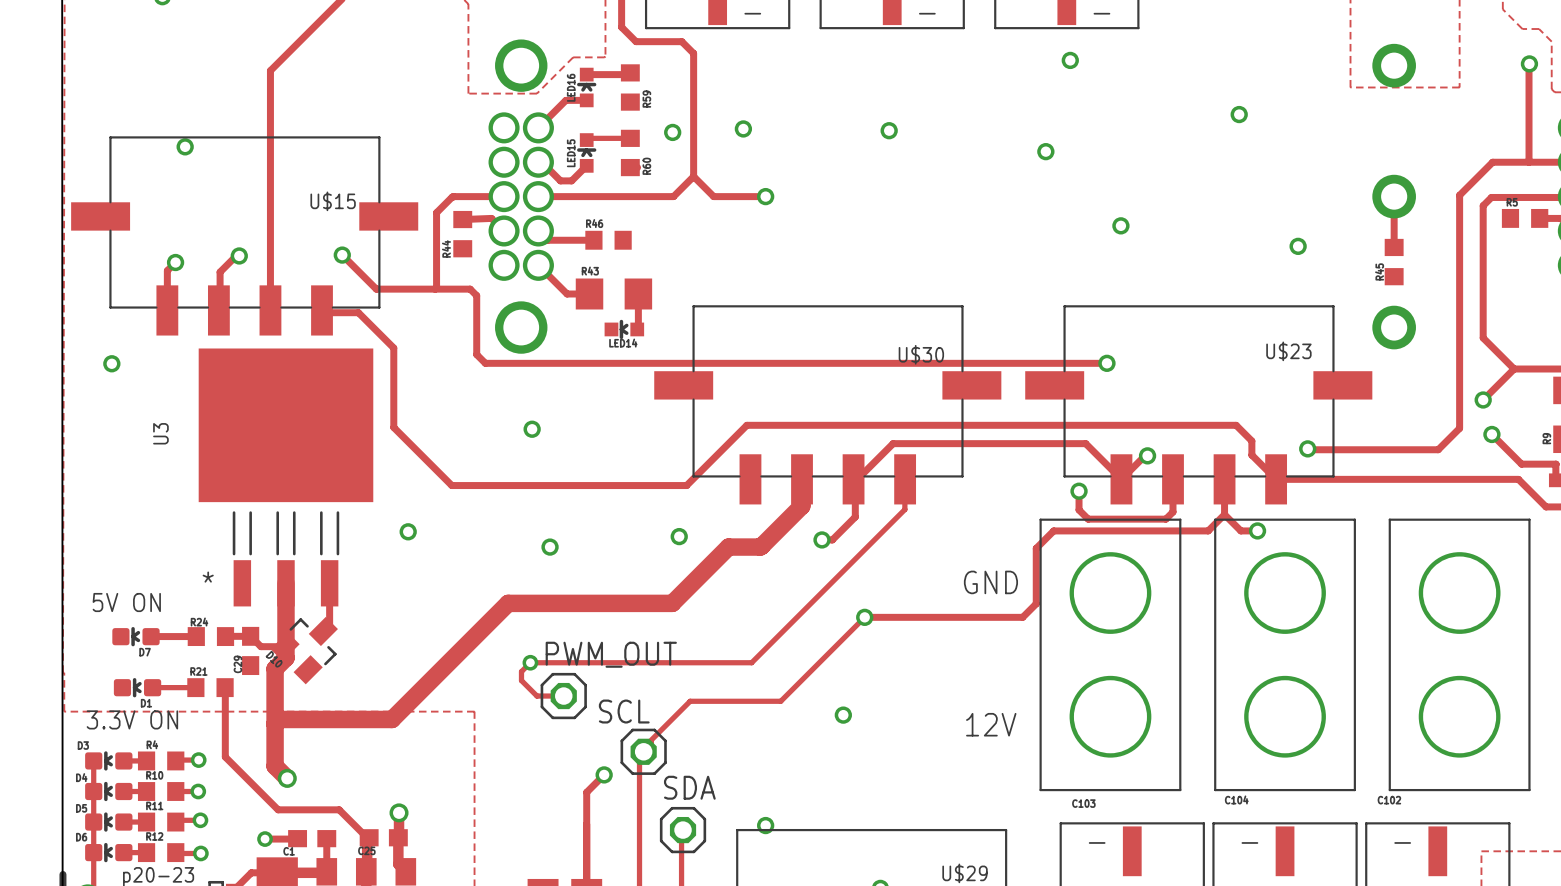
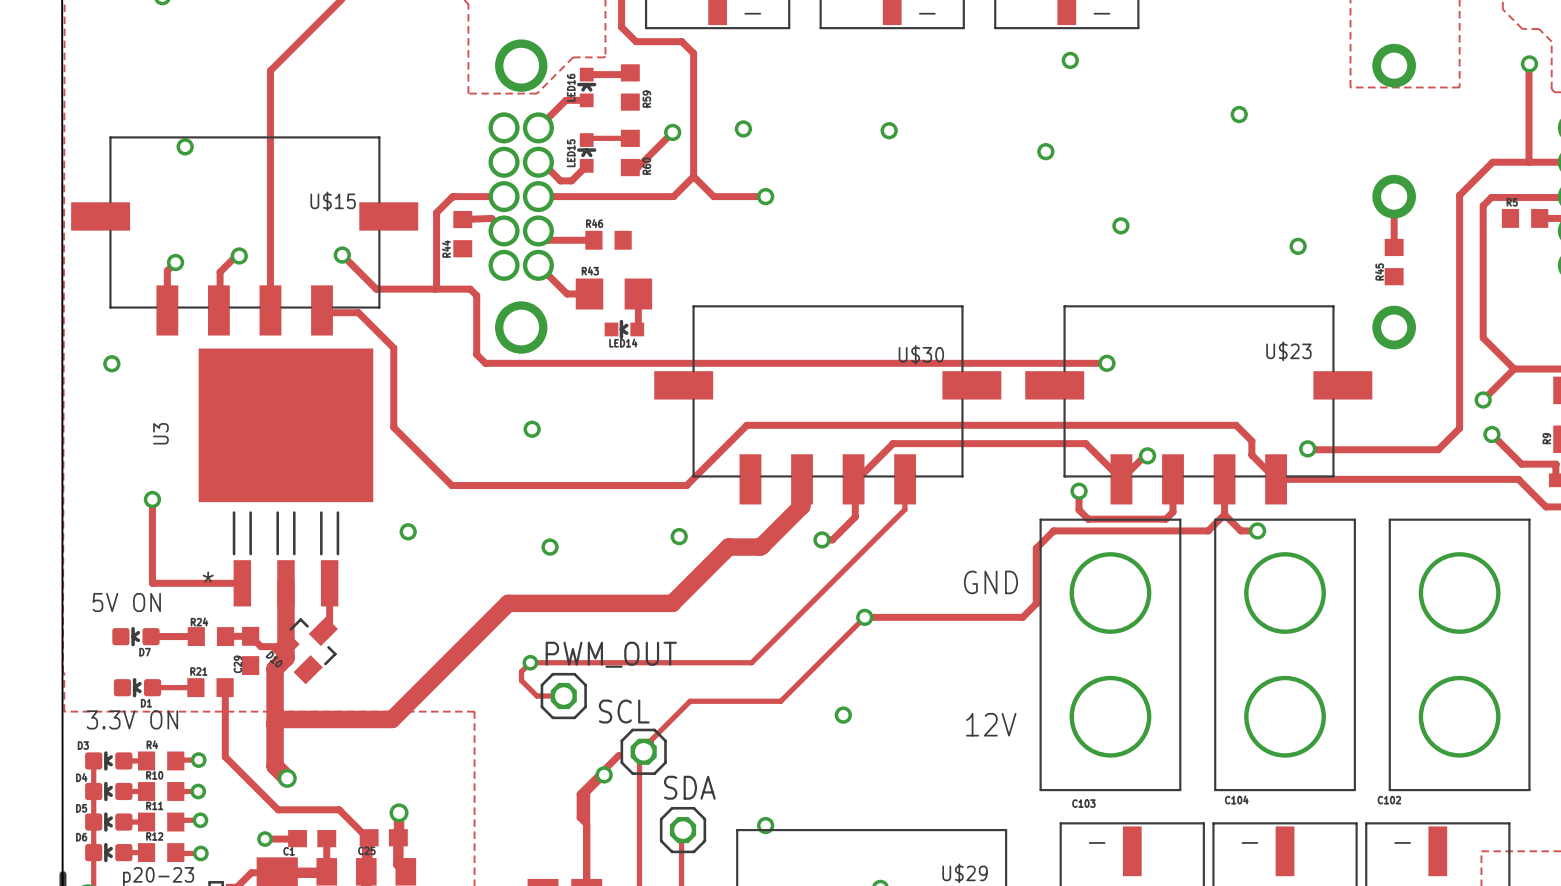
track: none -> (672, 132) (637, 167)
track: none -> (152, 499) (152, 583) (242, 583)
via: none -> (152, 499)
track: none -> (619, 755) (580, 794) (580, 817) (586, 824)

